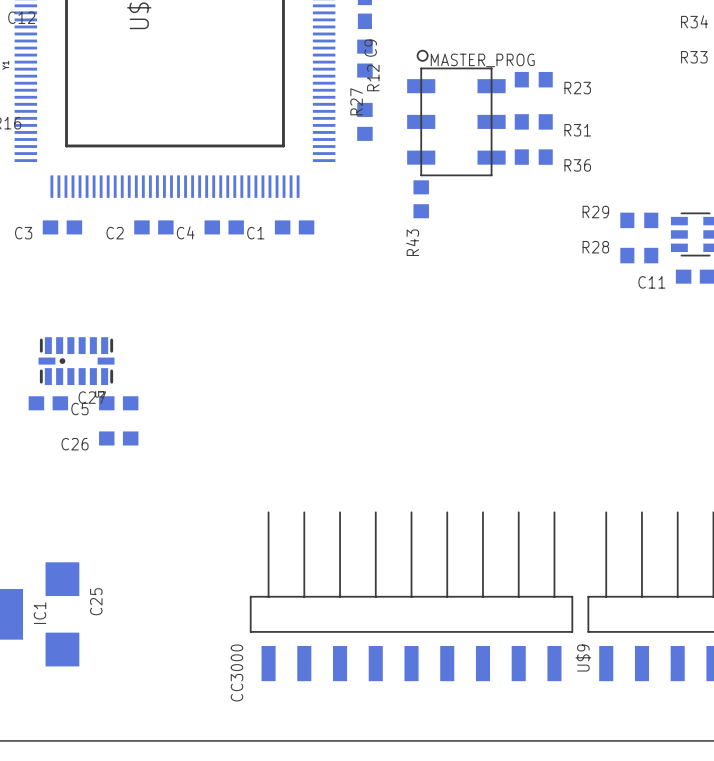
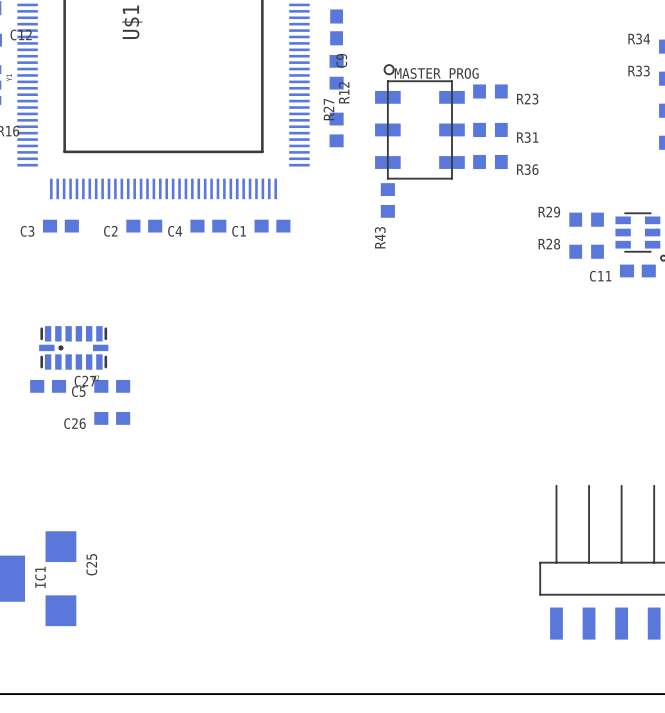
U$9: CC3000 (411, 596) -> none

